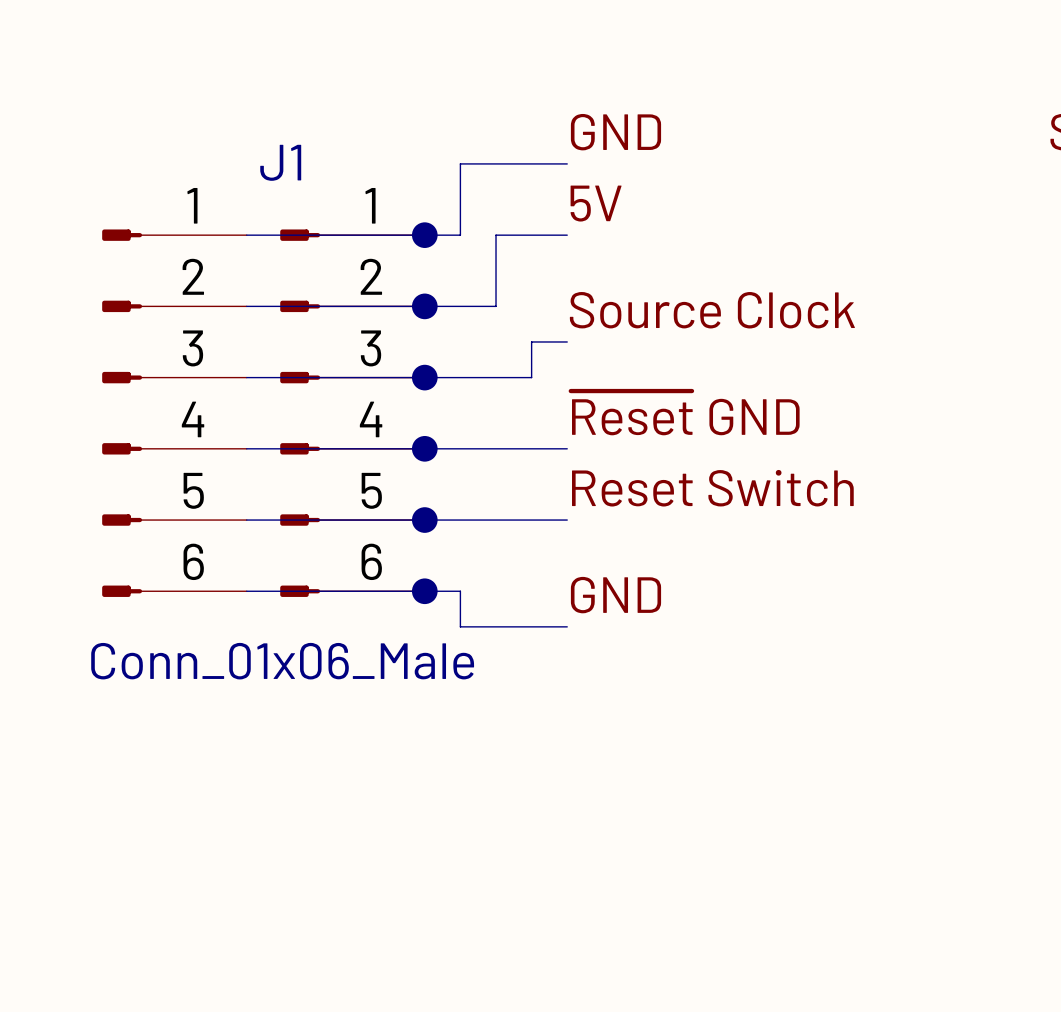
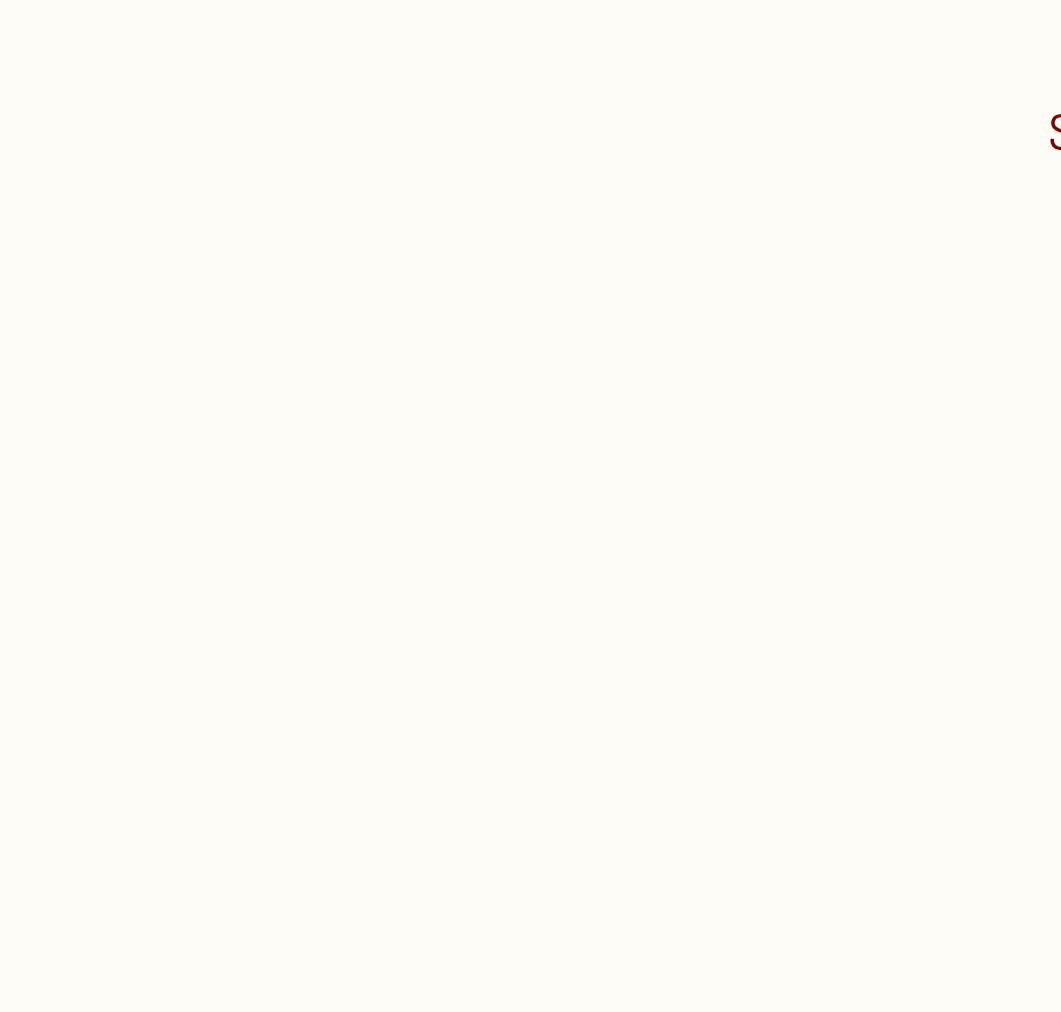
label: GND (615, 132) -> none
wire: (567, 163) (460, 163) (460, 235) (246, 235) -> none
label: 5V (596, 203) -> none
junction: (424, 235) -> none
wire: (567, 235) (496, 235) (496, 306) (246, 306) -> none
junction: (424, 306) -> none
label: Source Clock (712, 310) -> none
wire: (567, 341) (531, 341) (531, 377) (246, 377) -> none
junction: (424, 377) -> none
part: (174, 413) -> none
J1: Conn_01x06_Male (352, 413) -> none
label: ~{Reset} GND (685, 413) -> none
wire: (246, 448) (567, 448) -> none
junction: (424, 448) -> none
label: Reset Switch (712, 488) -> none
wire: (246, 520) (567, 520) -> none
junction: (424, 520) -> none
wire: (246, 591) (460, 591) (460, 626) (567, 626) -> none
junction: (424, 591) -> none
label: GND (615, 595) -> none

